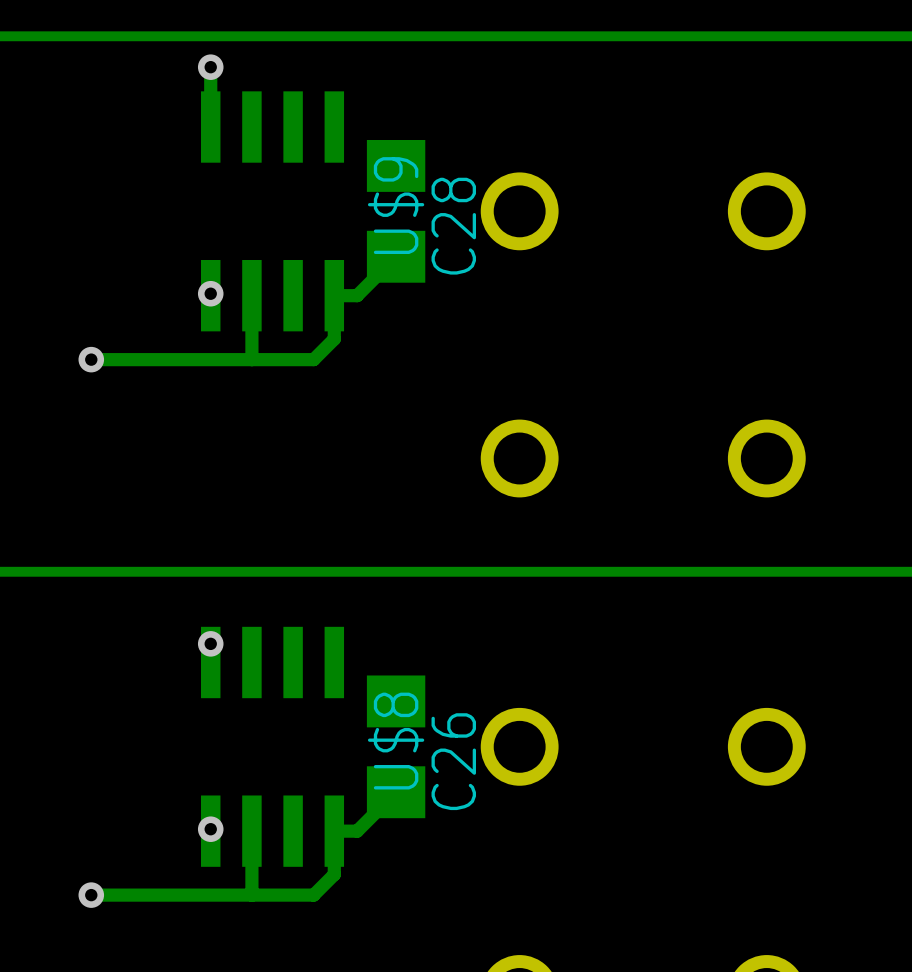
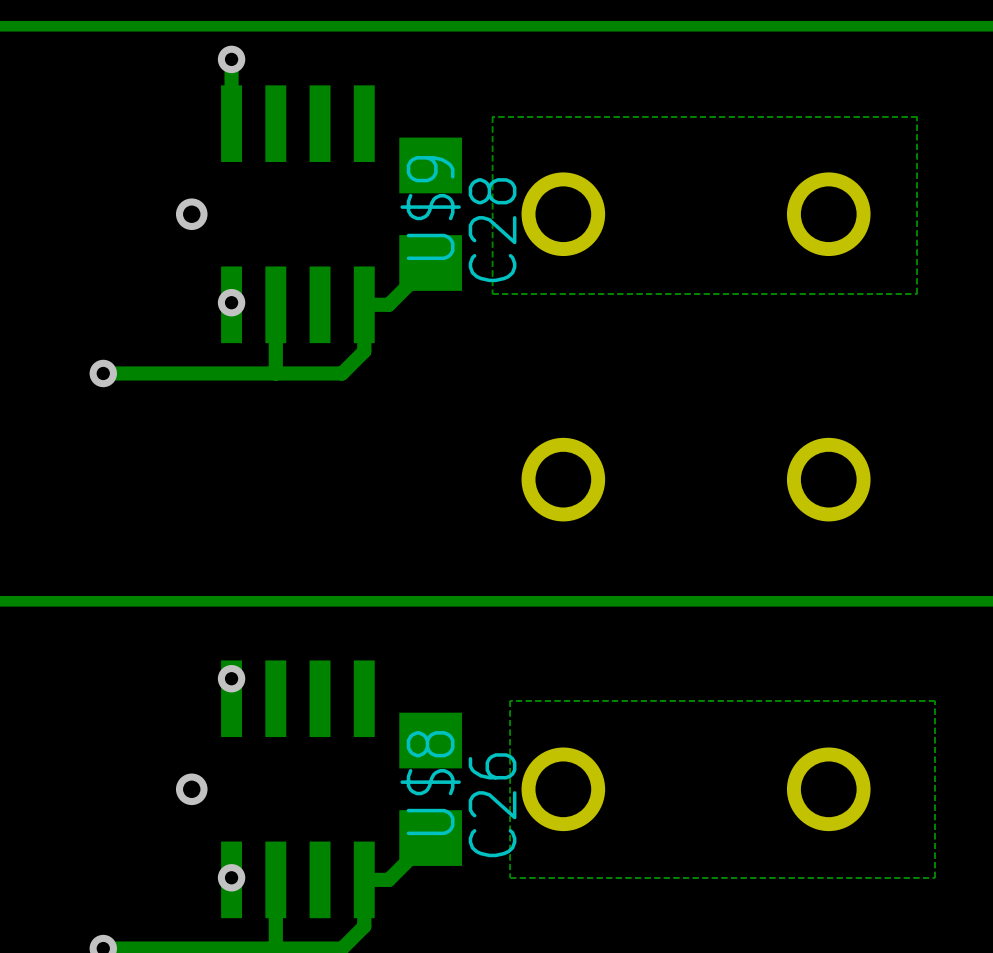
zone outline: none -> (917, 116) (492, 116) (492, 293) (917, 293) (917, 116)
via: none -> (191, 214)
zone outline: none -> (934, 700) (510, 700) (510, 877) (934, 877) (934, 700)
via: none -> (191, 789)

